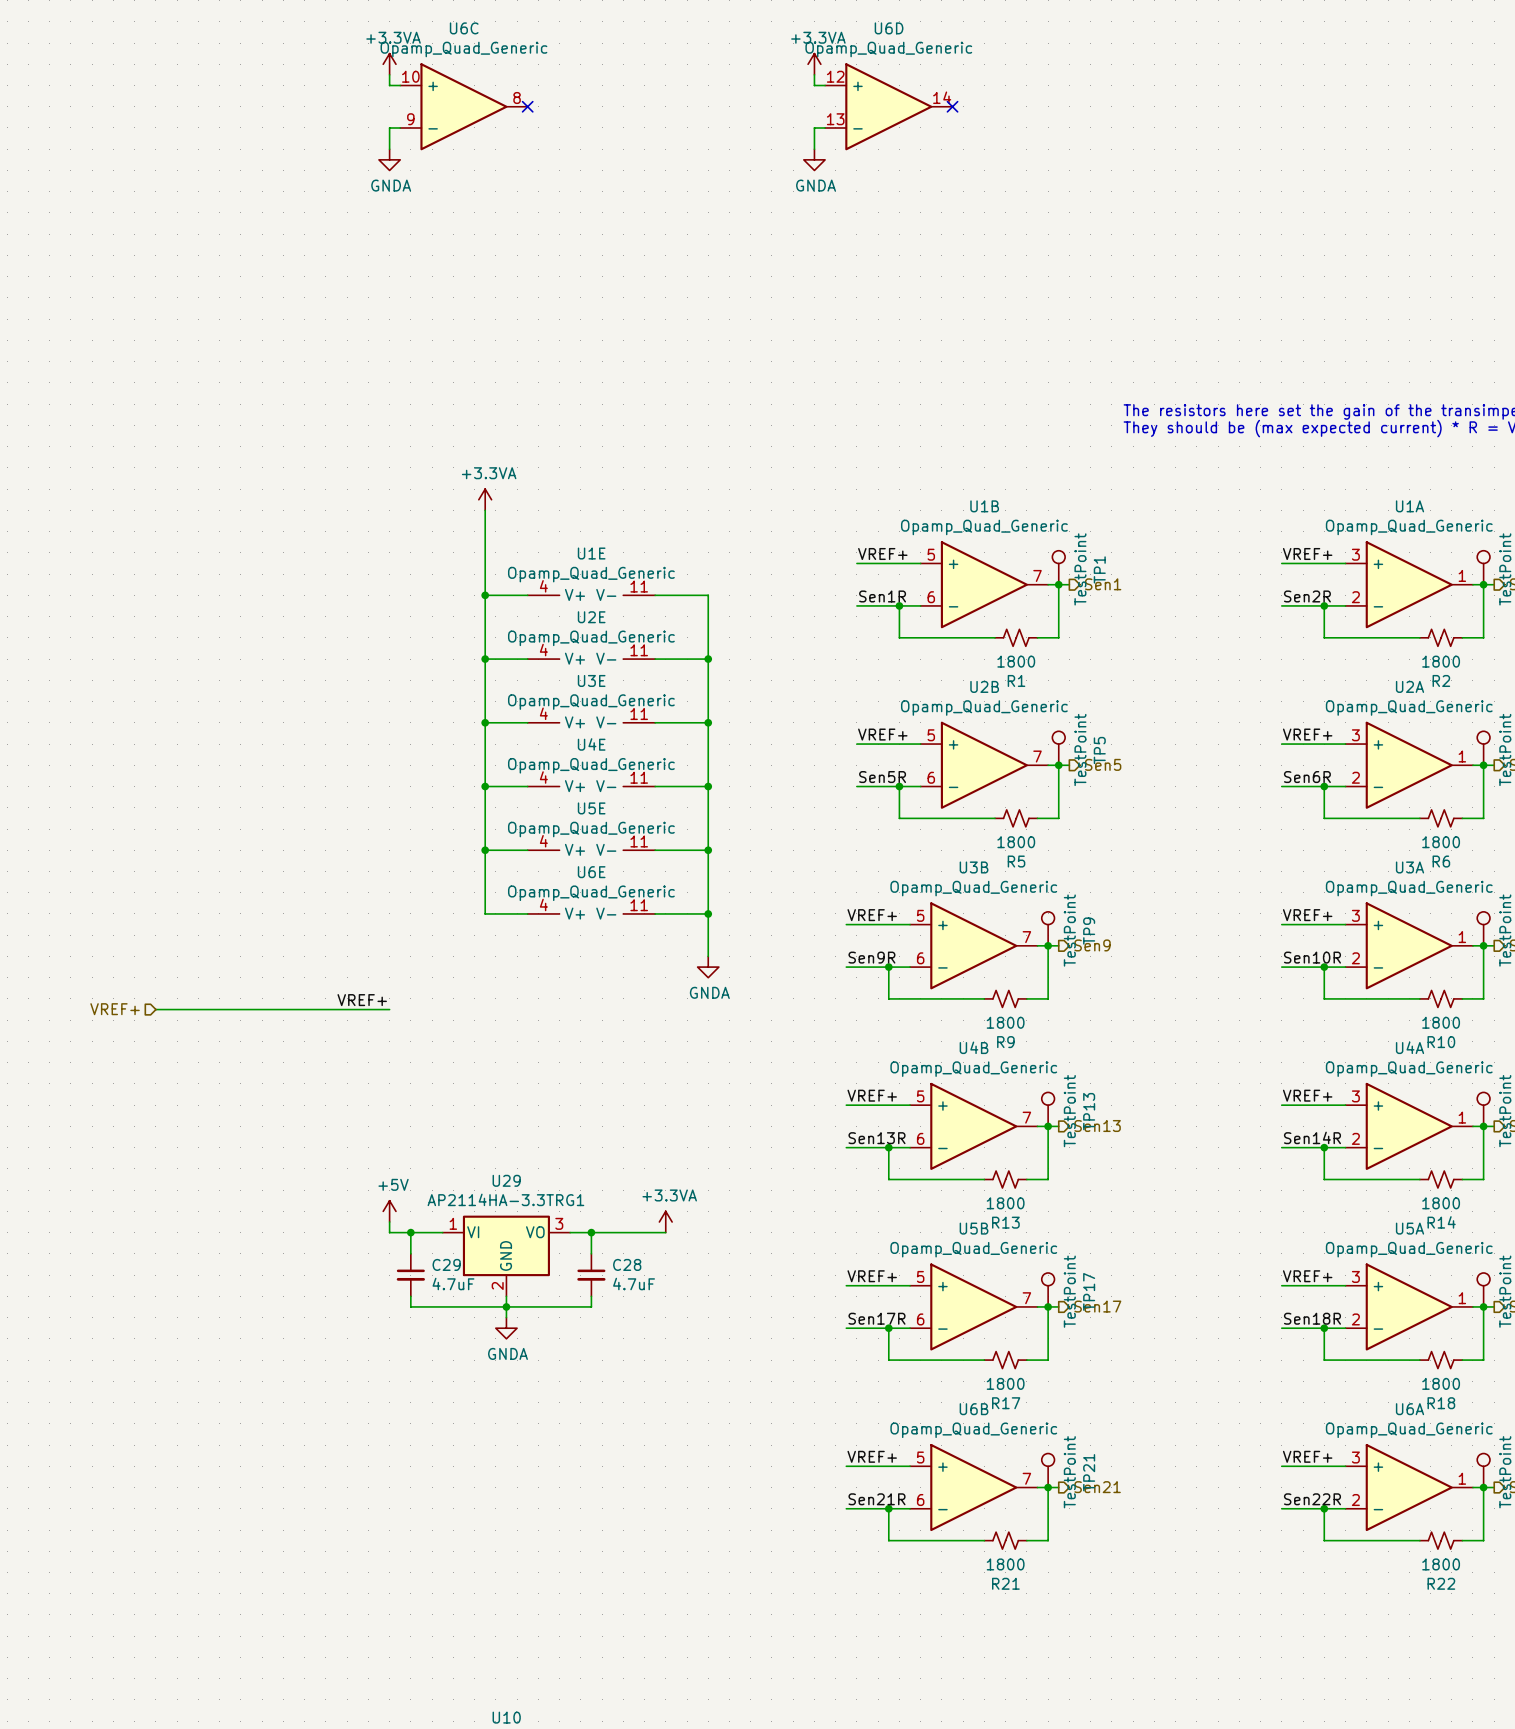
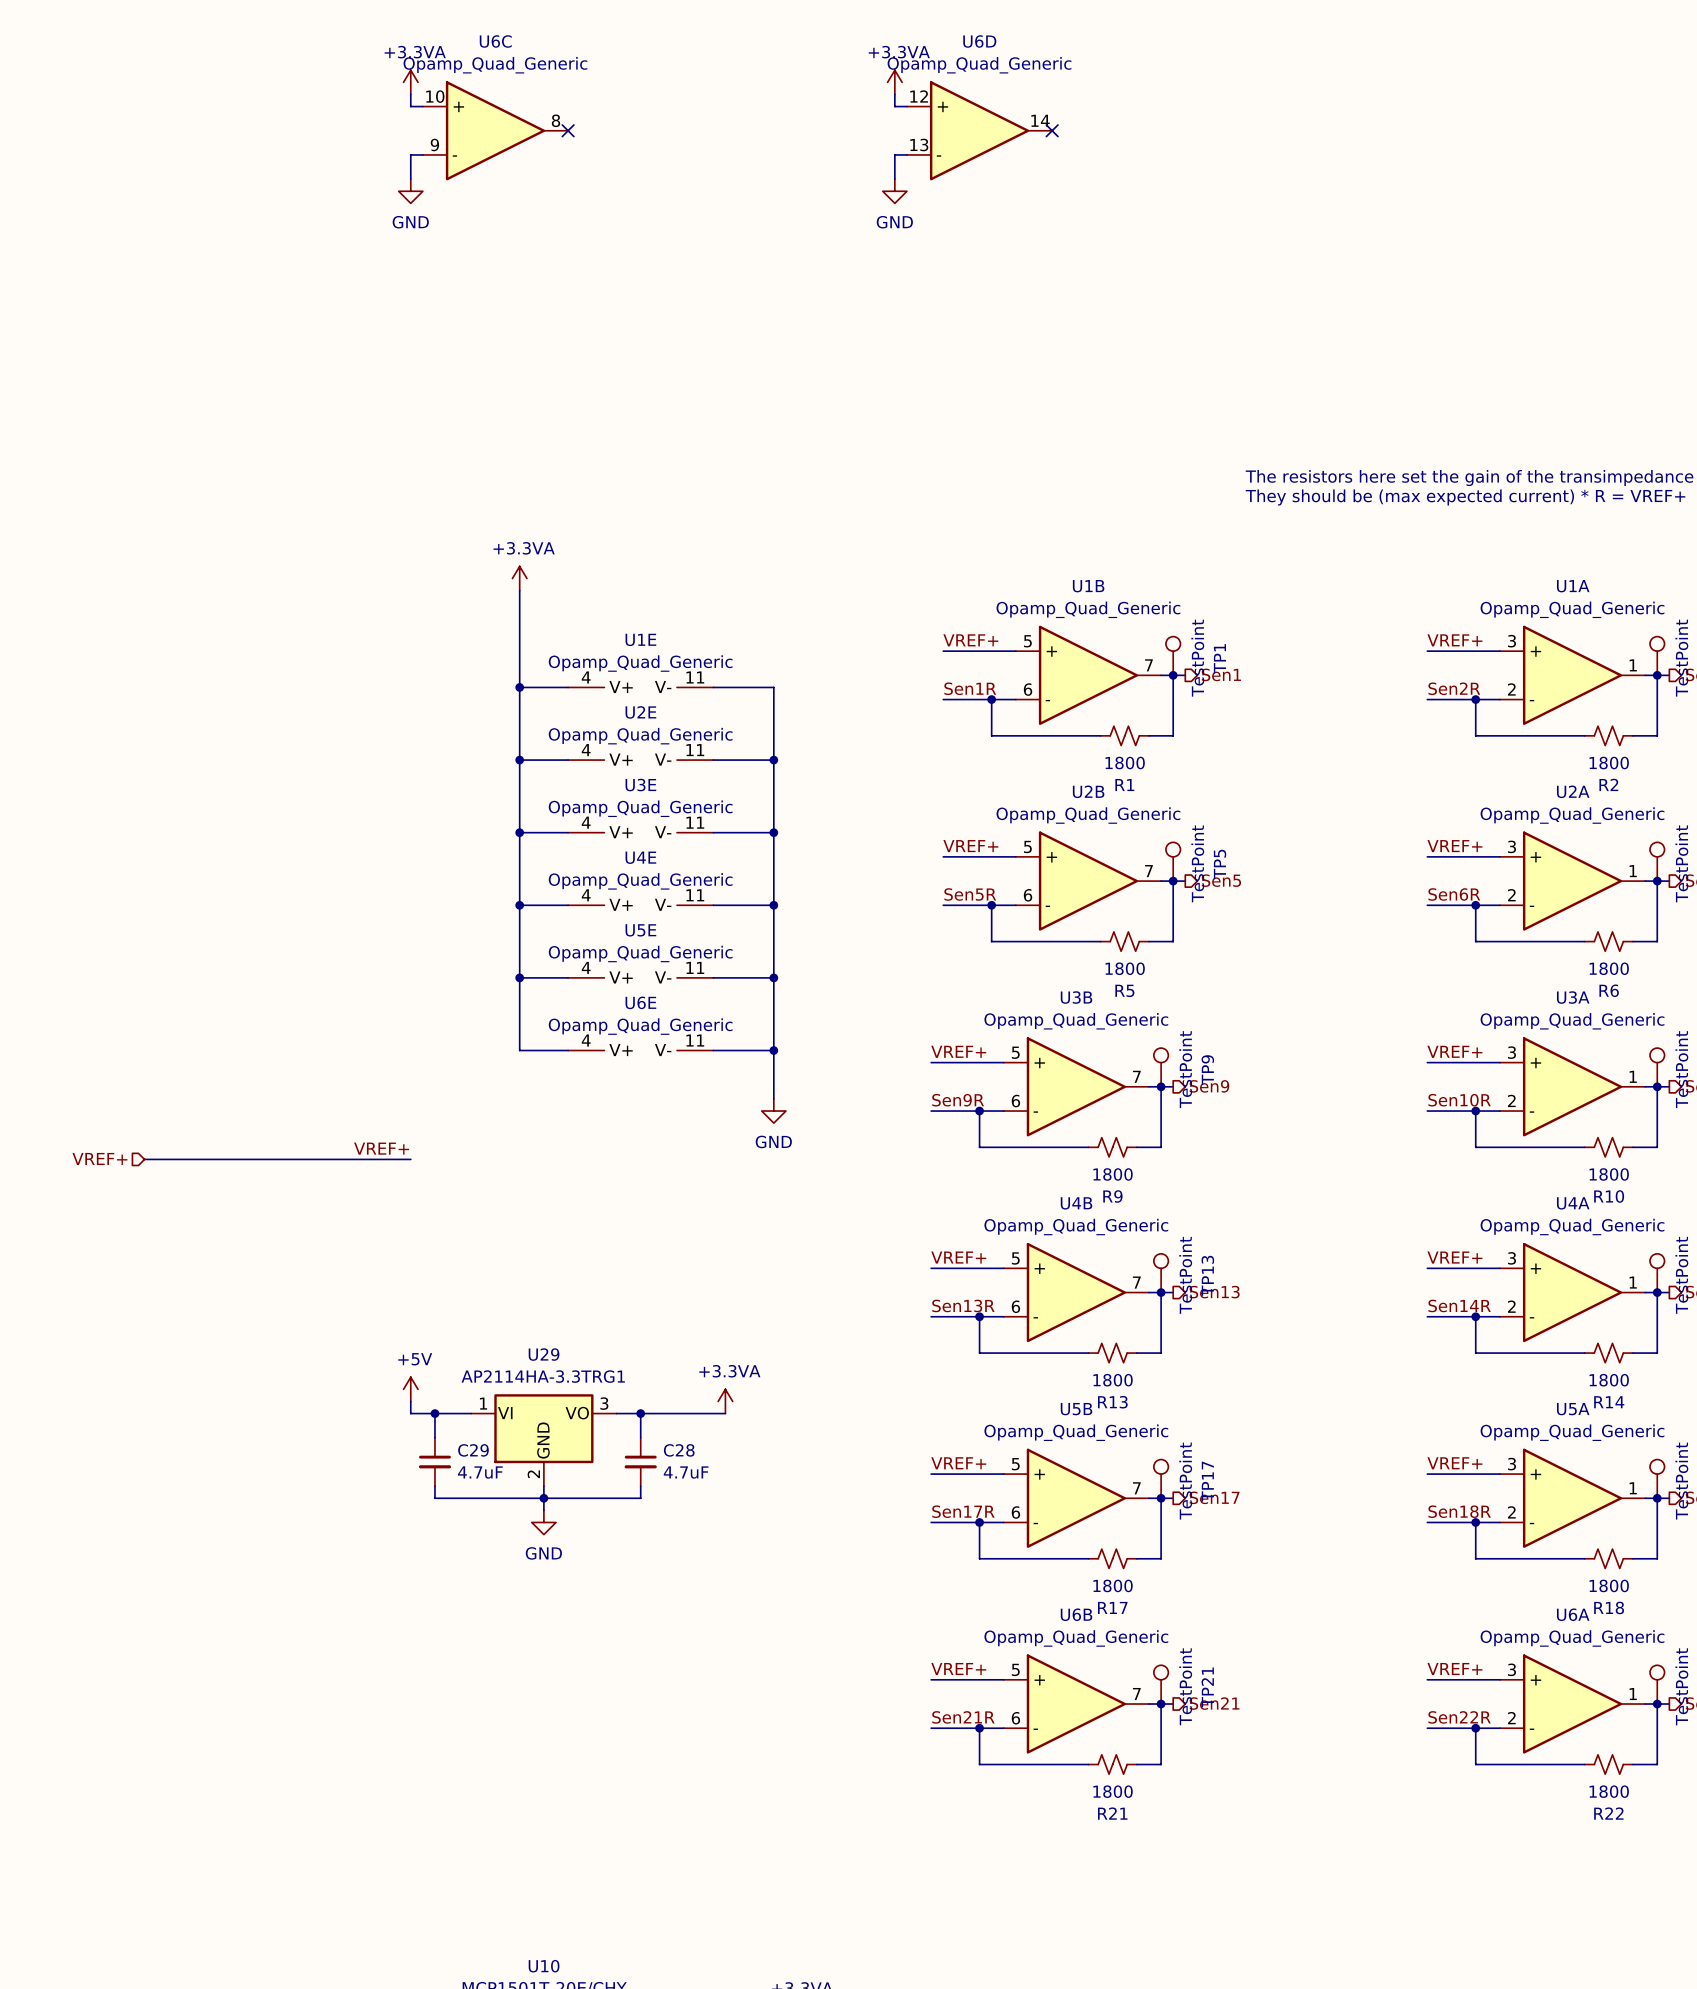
power symbol: GNDA (389, 159) -> GND (410, 191)
power symbol: GNDA (814, 159) -> GND (894, 191)
power symbol: GNDA (708, 967) -> GND (773, 1111)
power symbol: GNDA (506, 1328) -> GND (543, 1522)

